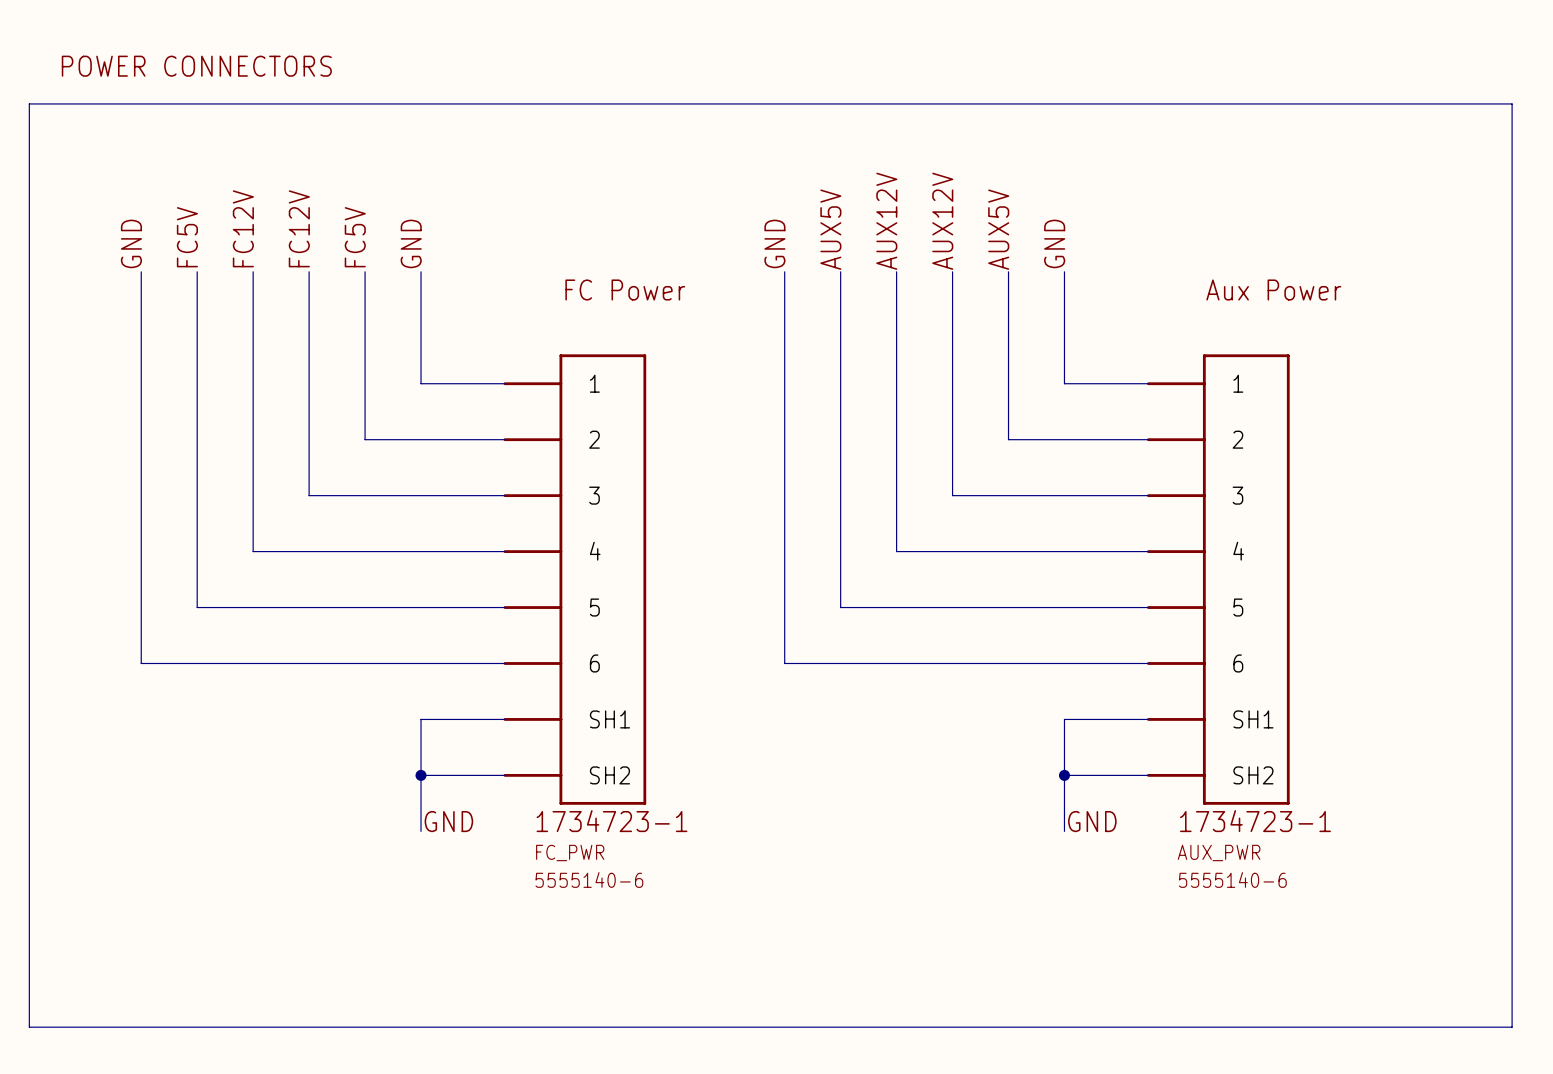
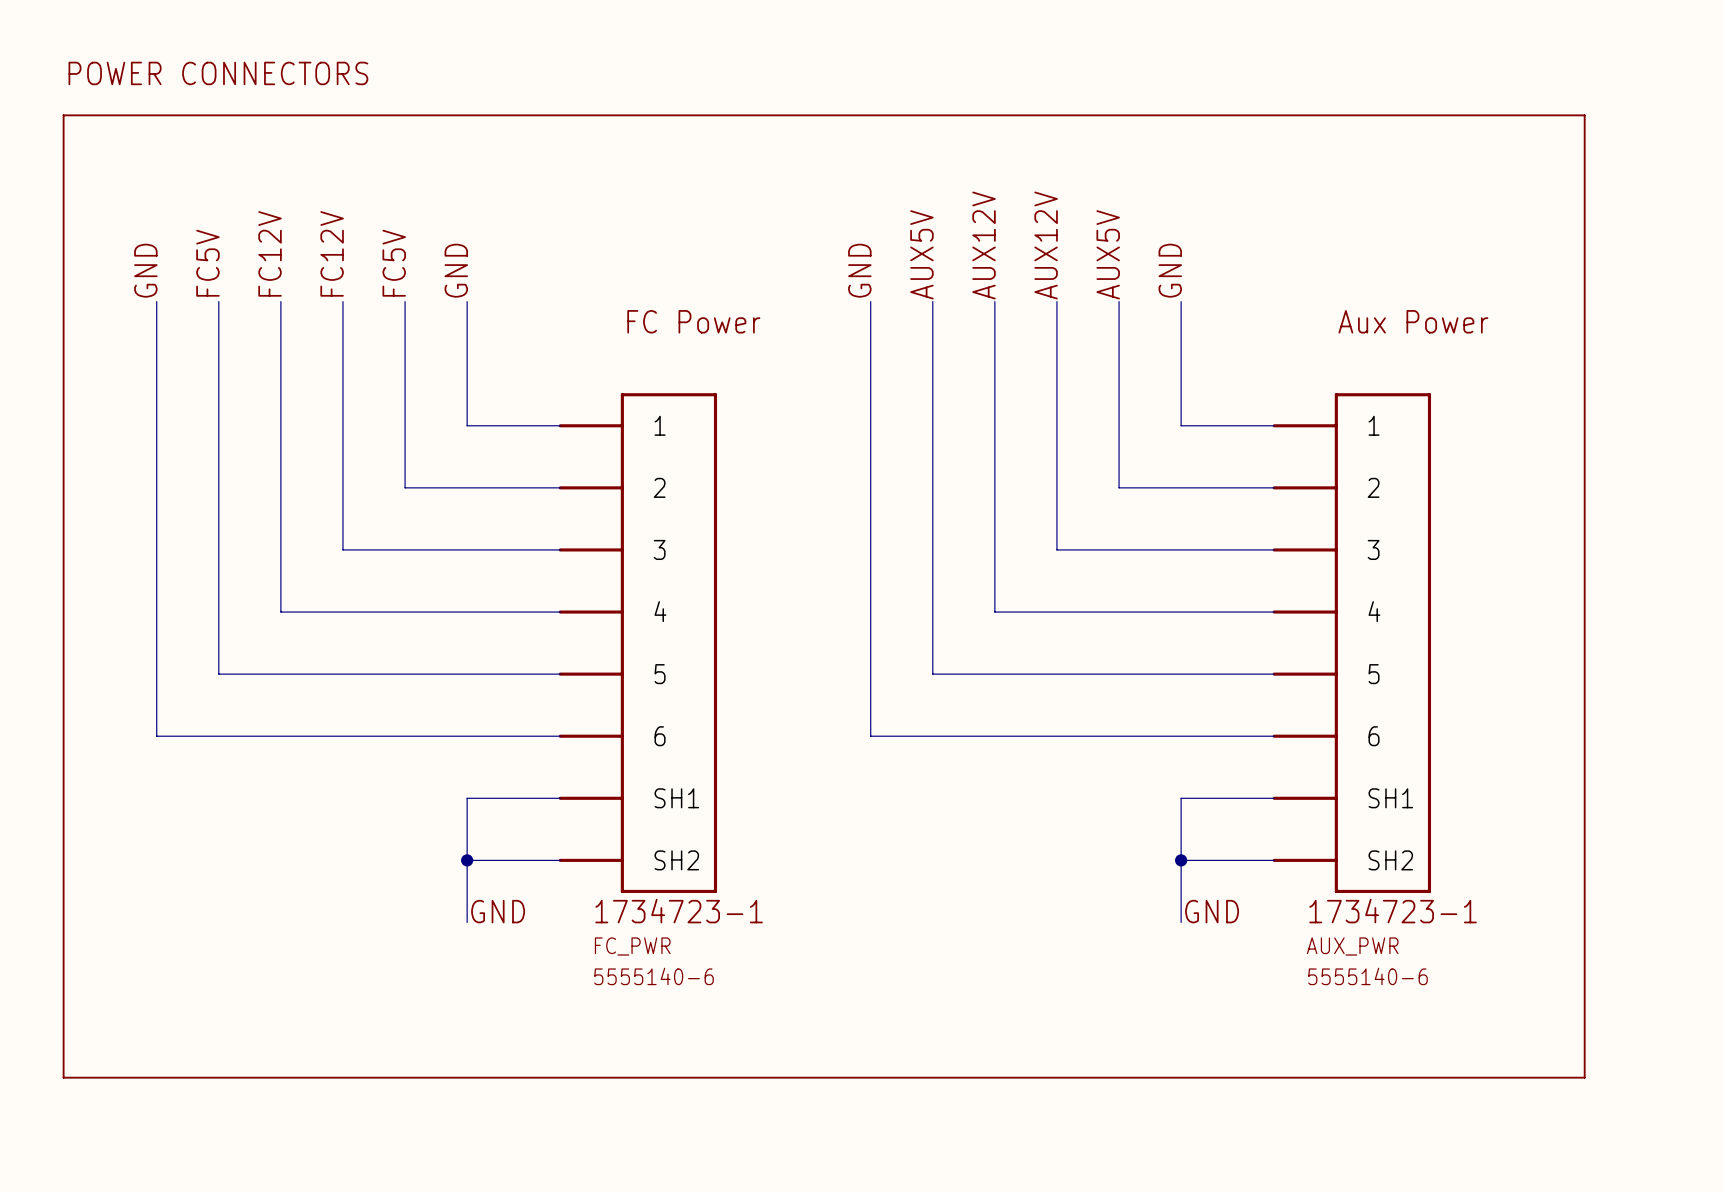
wire: (29, 103) (1512, 103) (1512, 1027) (29, 1027) (29, 103) -> none
line: none -> (63, 115) (1584, 115) (1584, 1077) (63, 1077) (63, 115)

